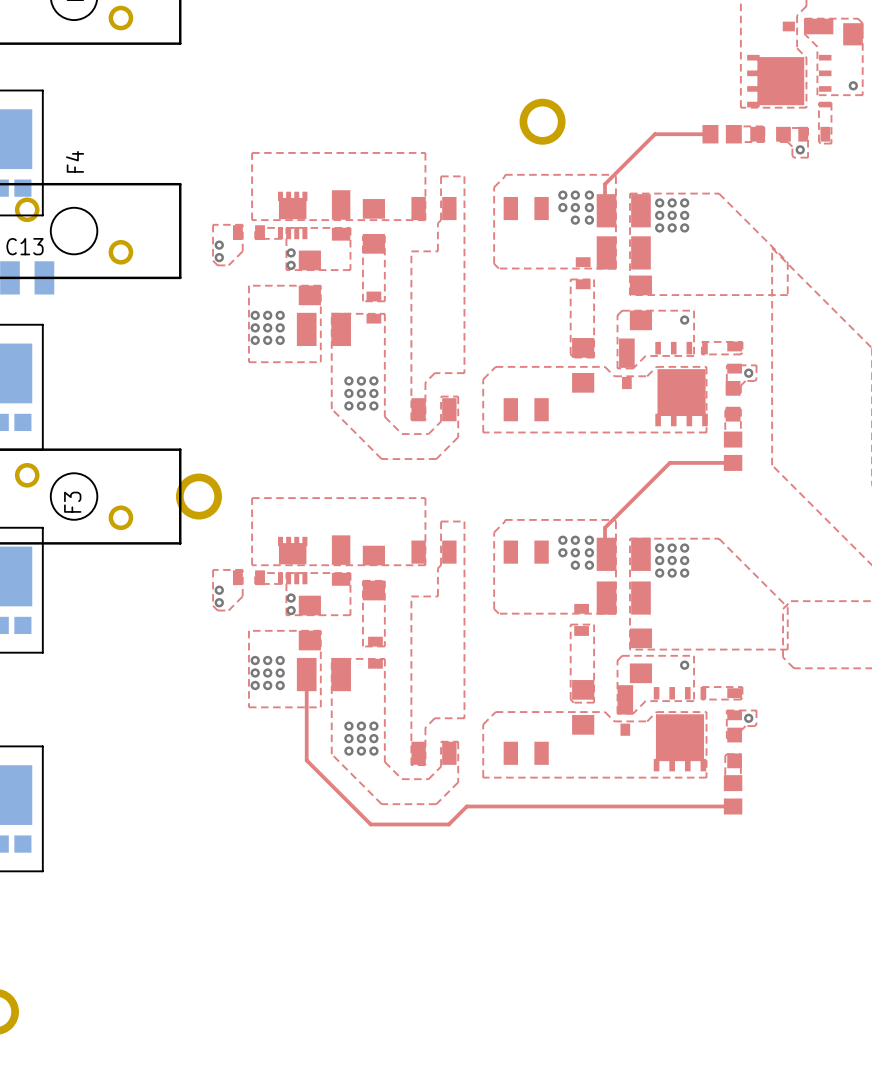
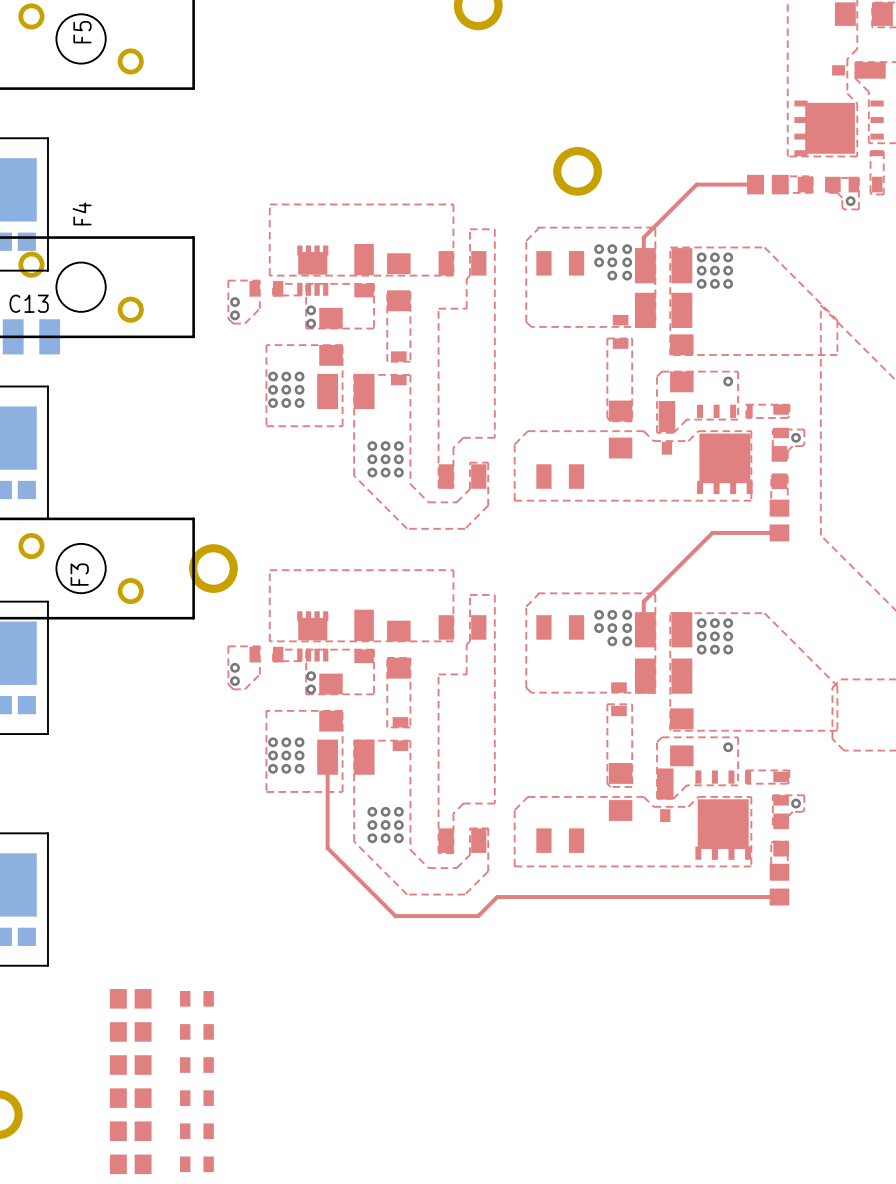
part: none -> (130, 998)
part: none -> (196, 998)
part: none -> (130, 1031)
part: none -> (196, 1031)
part: none -> (130, 1065)
part: none -> (196, 1065)
part: none -> (130, 1098)
part: none -> (196, 1098)
part: none -> (130, 1131)
part: none -> (196, 1131)
part: none -> (130, 1164)
part: none -> (196, 1164)

